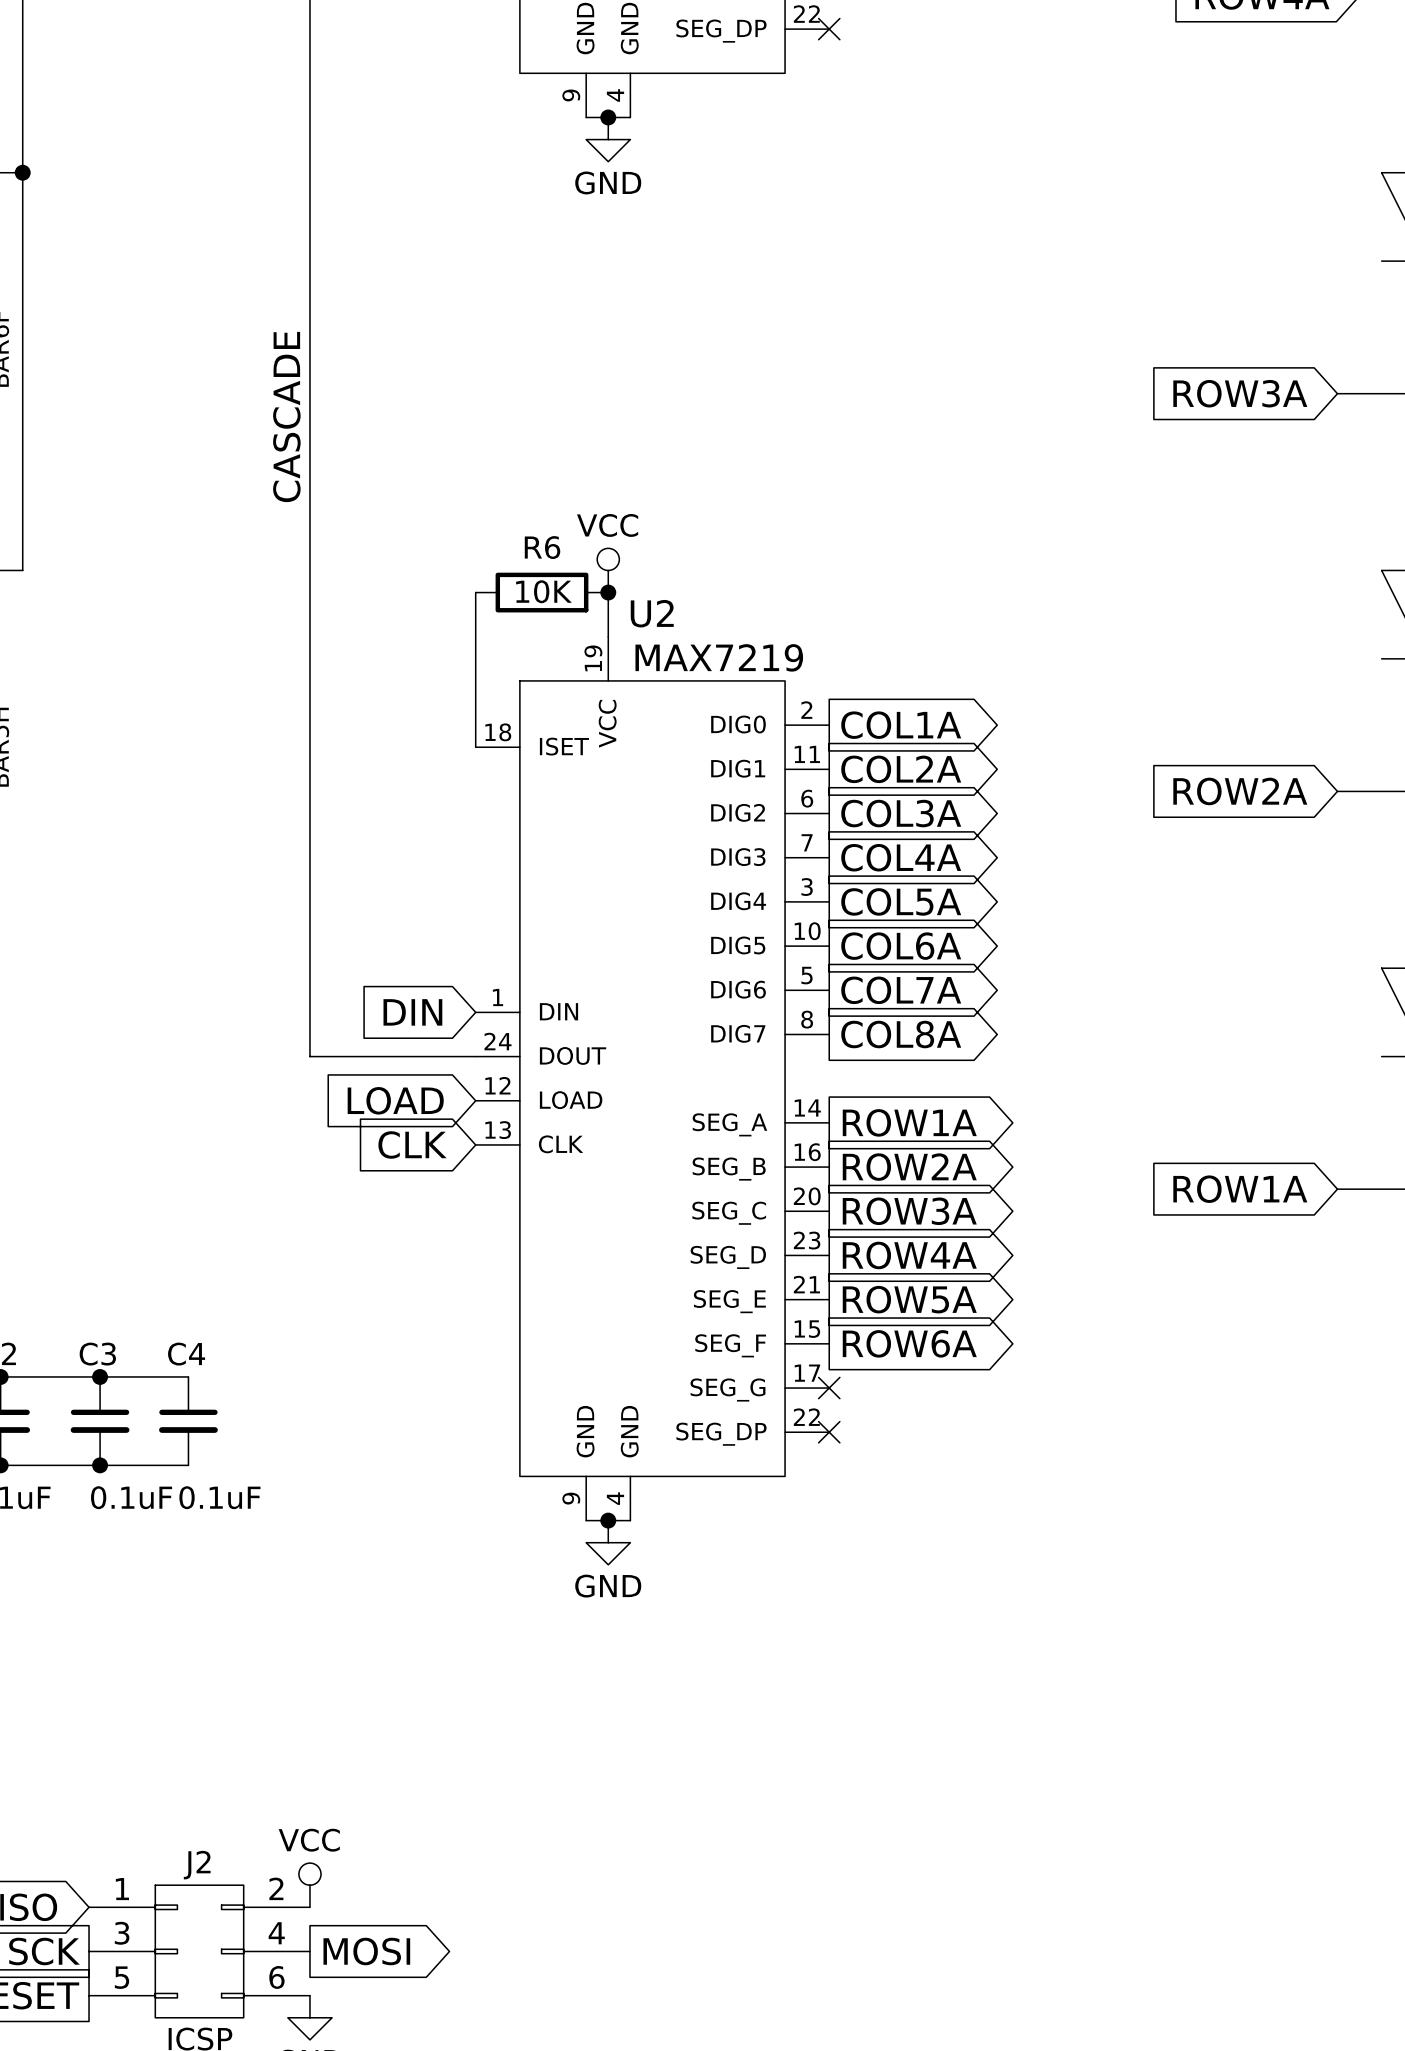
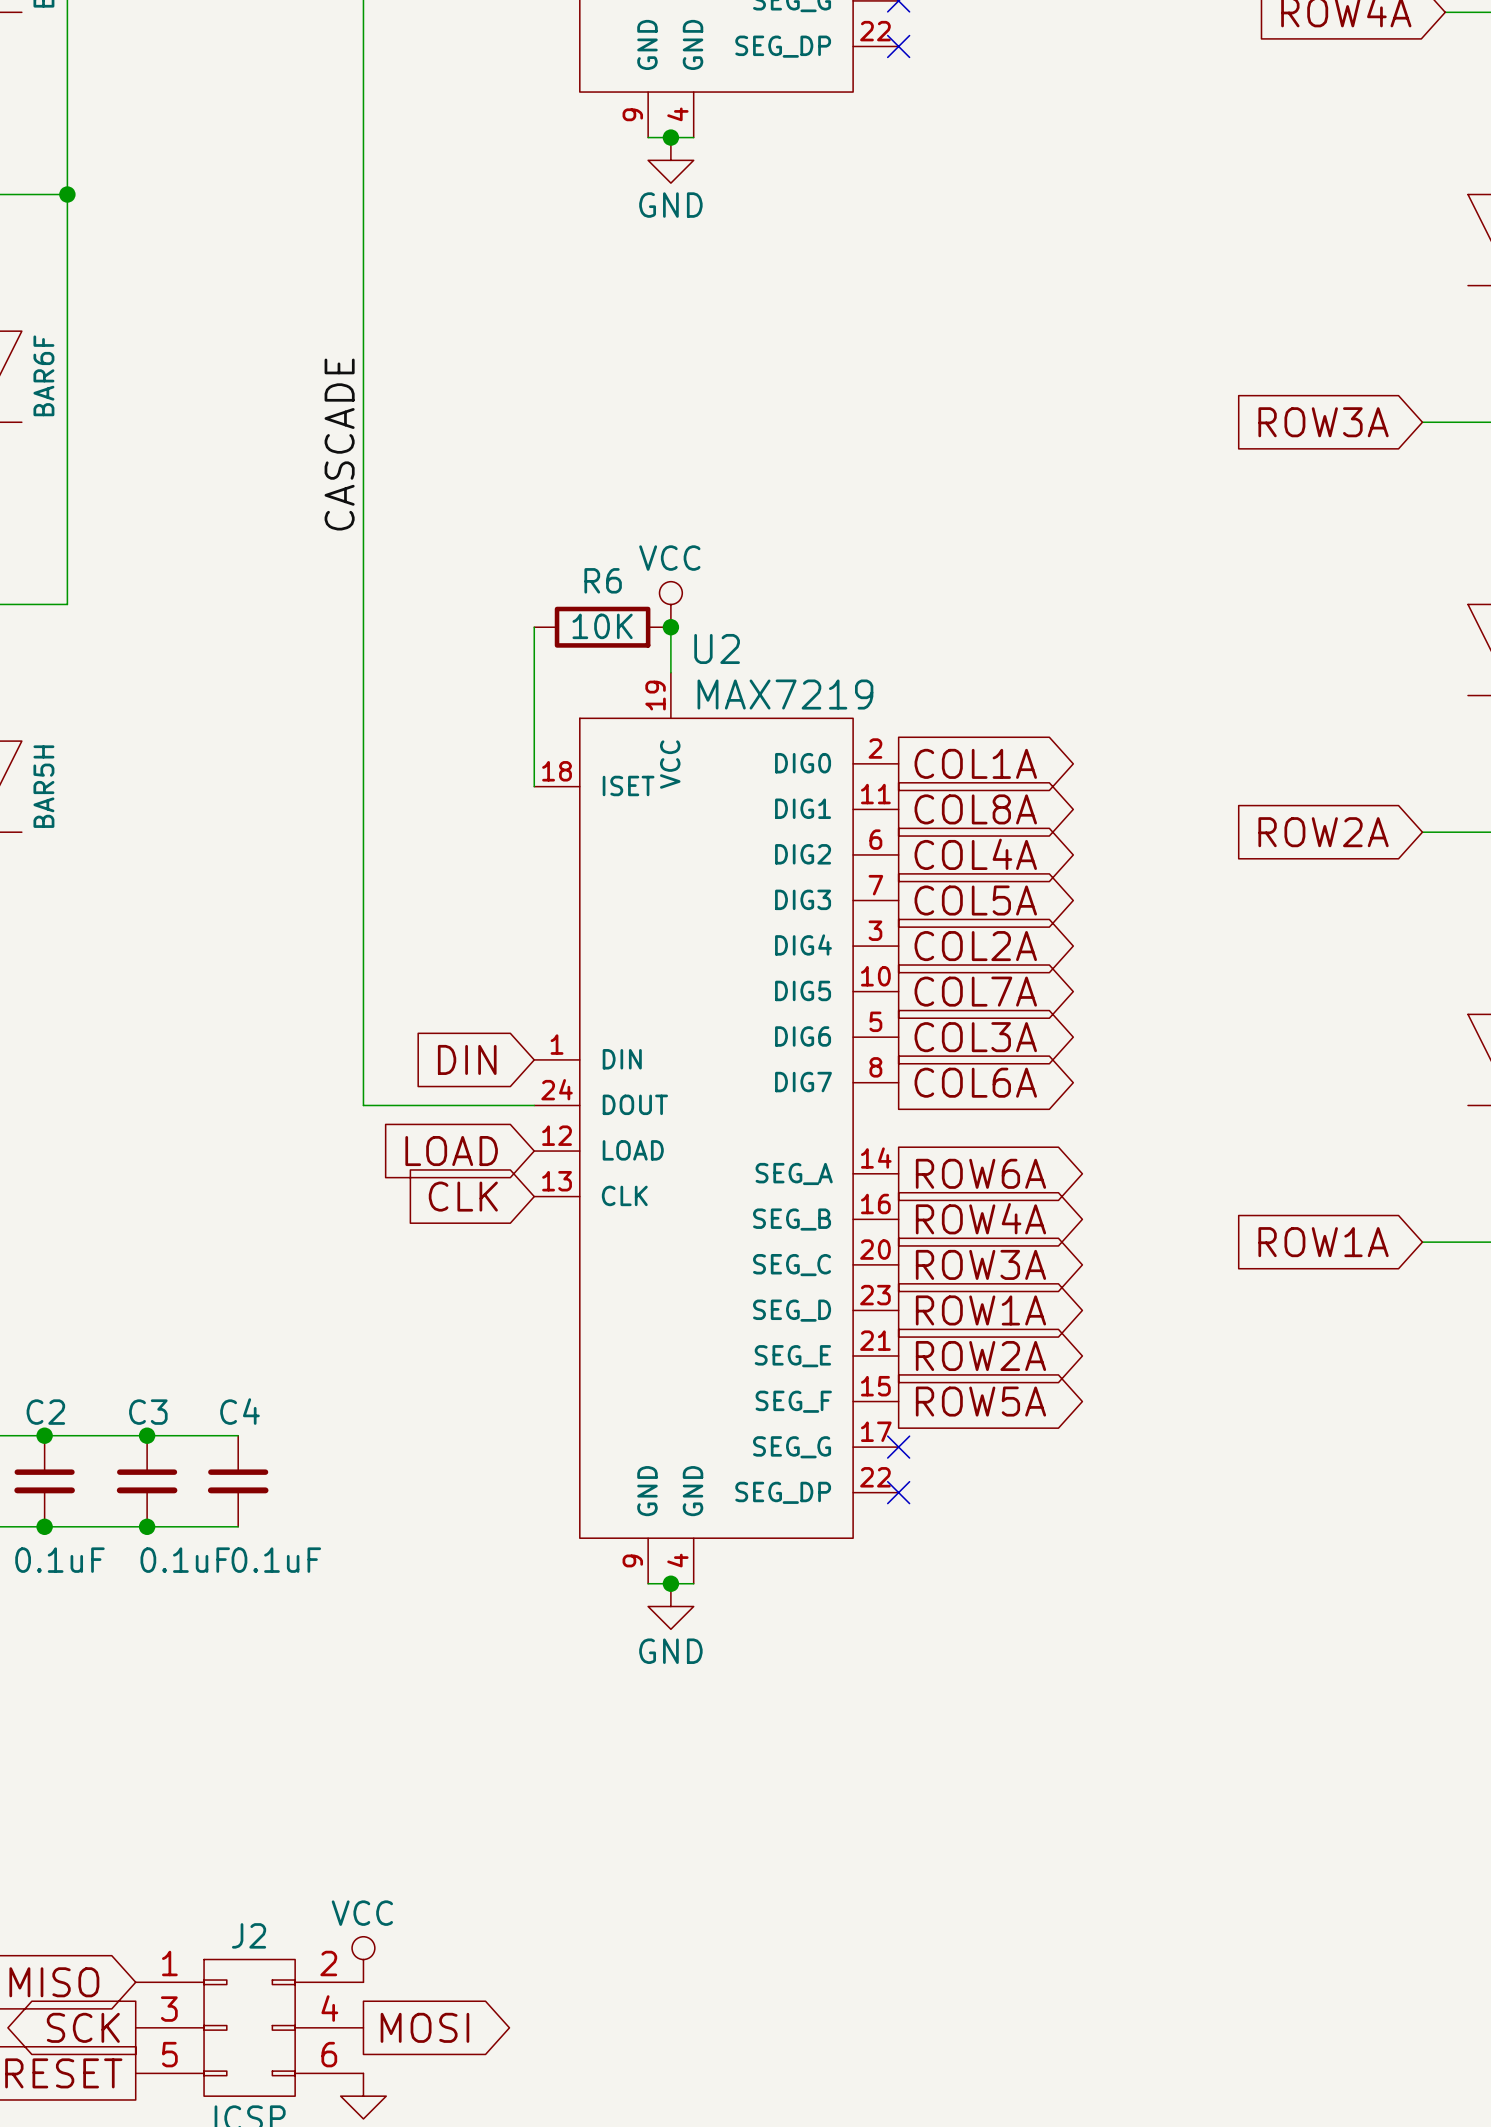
global label: COL2A (901, 769) -> COL8A (975, 809)
global label: COL3A (901, 813) -> COL4A (975, 854)
global label: COL4A (901, 857) -> COL5A (975, 900)
global label: COL5A (901, 901) -> COL2A (975, 946)
global label: COL6A (901, 946) -> COL7A (975, 991)
global label: COL7A (901, 990) -> COL3A (975, 1037)
global label: COL8A (901, 1034) -> COL6A (975, 1082)
global label: ROW1A (909, 1122) -> ROW6A (980, 1173)
global label: ROW2A (909, 1167) -> ROW4A (980, 1218)
global label: ROW4A (909, 1255) -> ROW1A (980, 1310)
global label: ROW5A (909, 1299) -> ROW2A (980, 1356)
global label: ROW6A (909, 1343) -> ROW5A (980, 1401)

